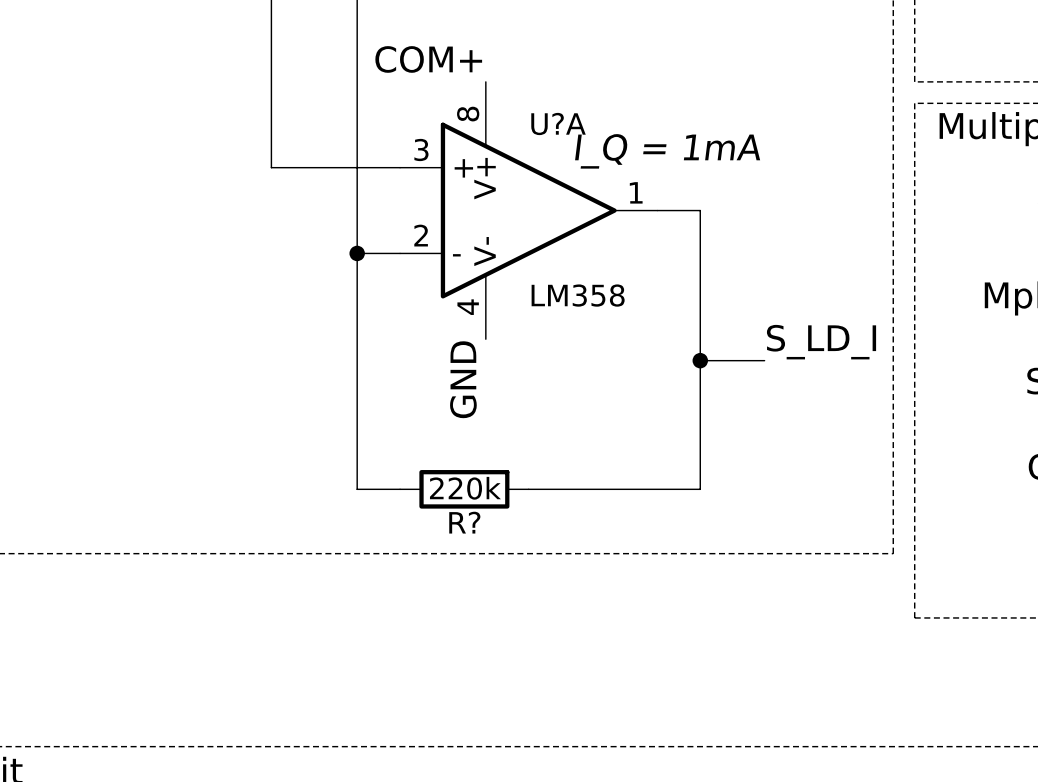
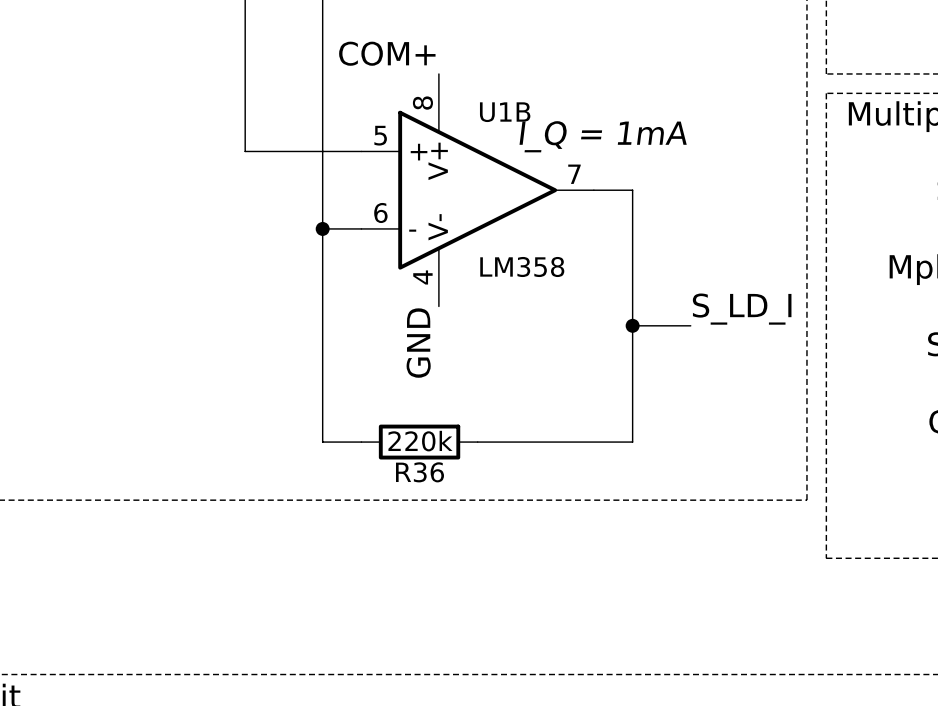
U?A name: U?A (558, 123) -> U1B (505, 112)
U?A pin number: 3 (421, 149) -> 5 (380, 135)
U?A pin number: 1 (636, 192) -> 7 (574, 174)
U?A pin number: 2 (421, 235) -> 6 (380, 212)
R? name: R? (464, 522) -> R36 (420, 472)

